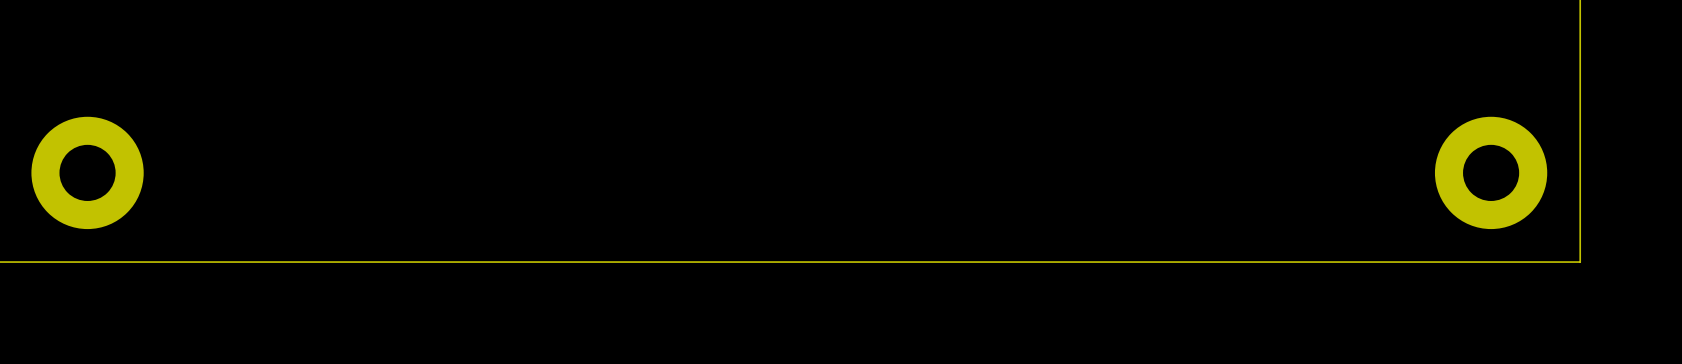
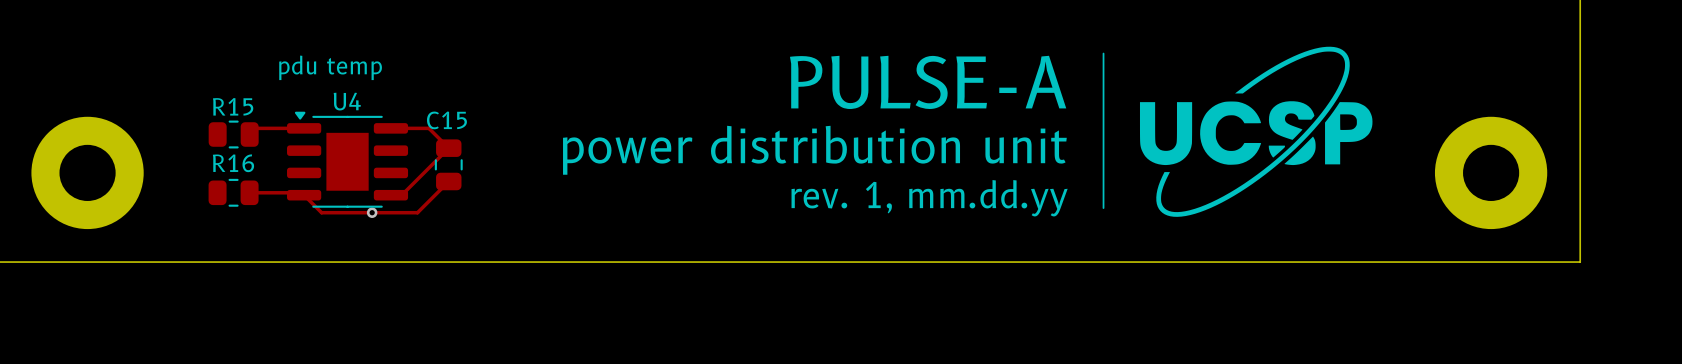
drawing: none -> [1139, 46, 1373, 217]
line: none -> (1103, 53) (1103, 208)
text: none -> pdu temp (330, 67)
text: none -> PULSE-A (928, 82)
top track: none -> (304, 128) (255, 128) (249, 134)
top track: none -> (390, 128) (428, 128) (448, 148) (401, 195) (390, 195)
R15: none -> (233, 134)
text: none -> power distribution unit (814, 150)
U4: none -> (347, 159)
C15: none -> (448, 164)
top track: none -> (448, 181) (417, 212) (321, 212) (301, 192) (249, 192)
R16: none -> (233, 192)
text: none -> rev. 1, mm.dd.yy (929, 198)
via: none -> (372, 212)

